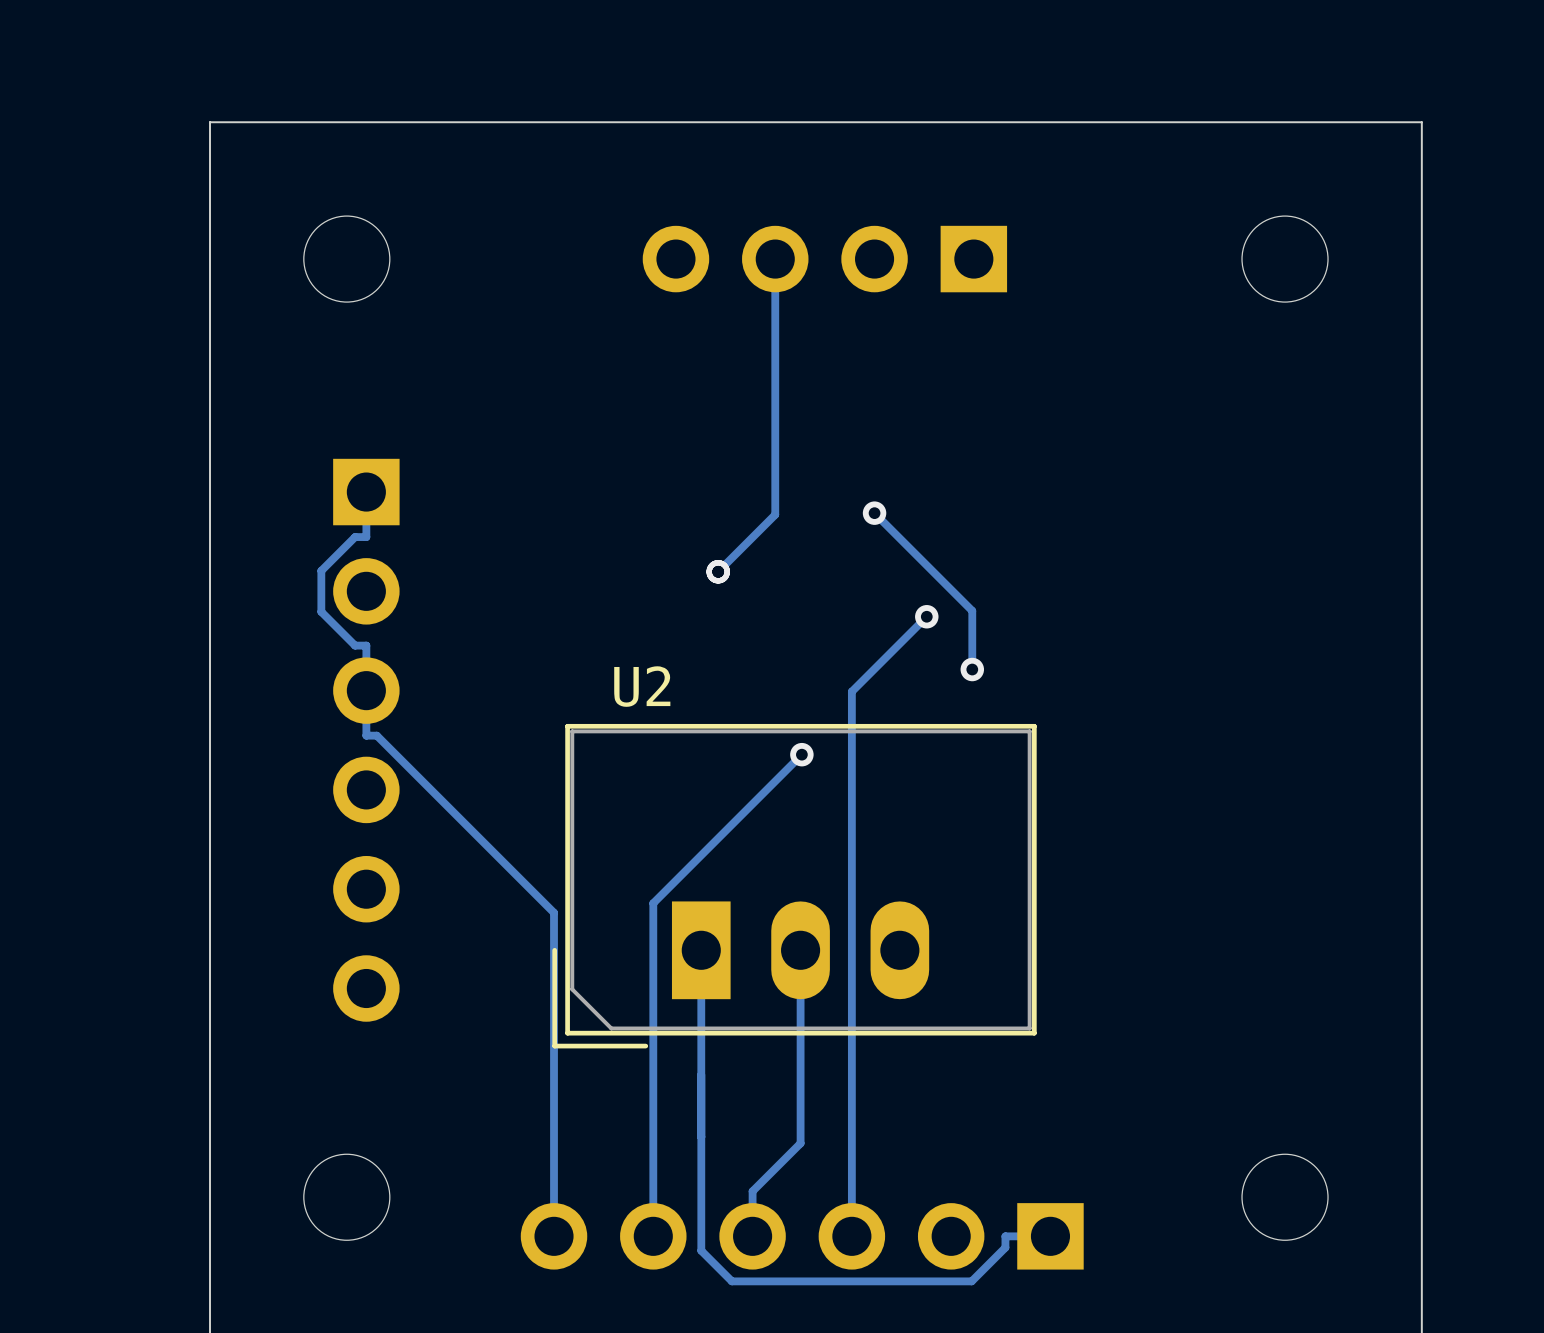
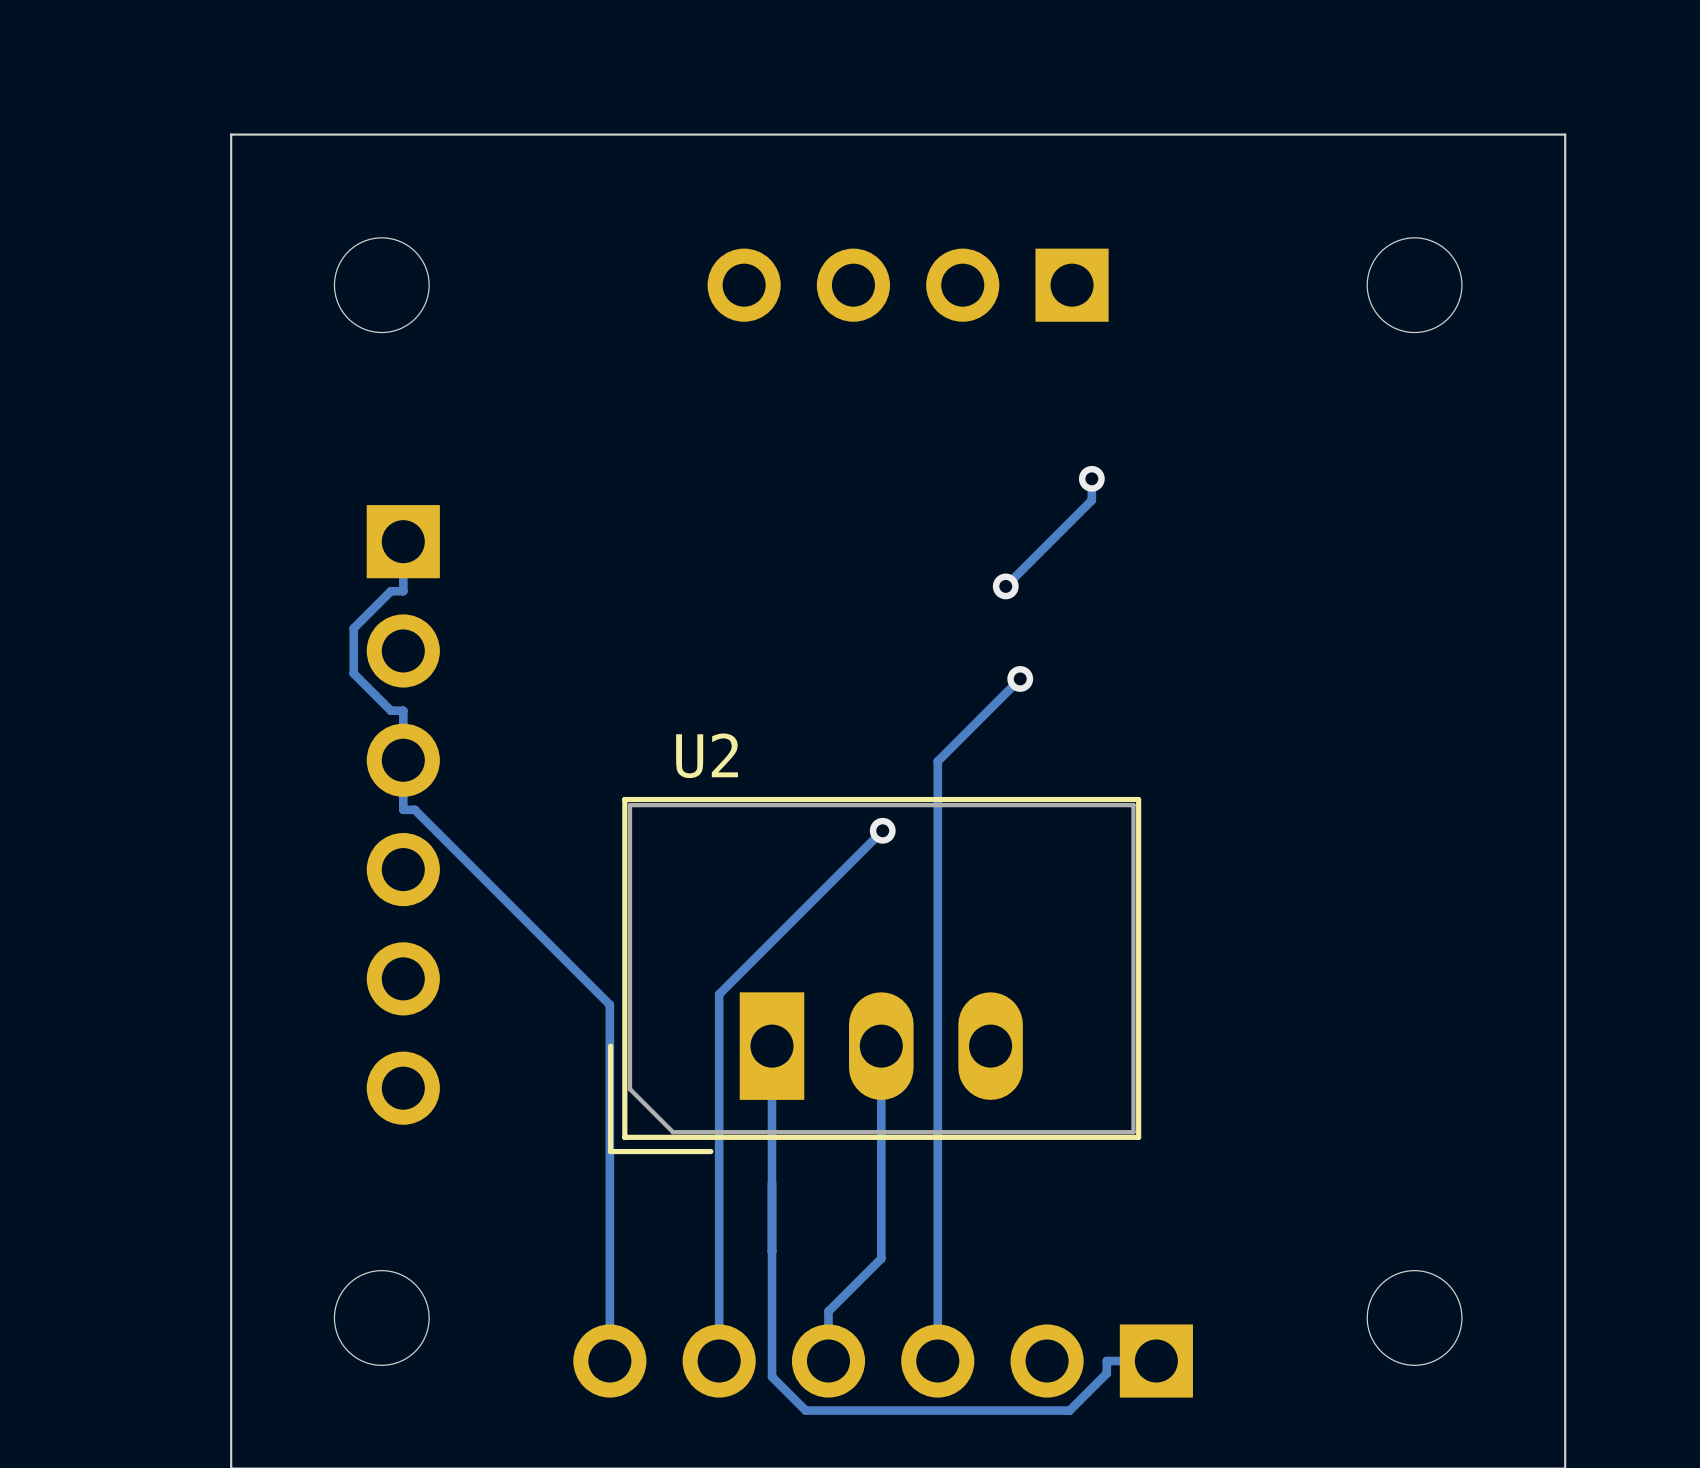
track: (775, 259) (775, 514) (718, 571) -> none
track: none -> (1091, 478) (1091, 500) (1005, 586)
via: none -> (1091, 478)
track: (874, 513) (972, 610) (972, 669) -> none
via position: (874, 513) -> (1005, 586)
via: (718, 571) -> none
via: (972, 669) -> none

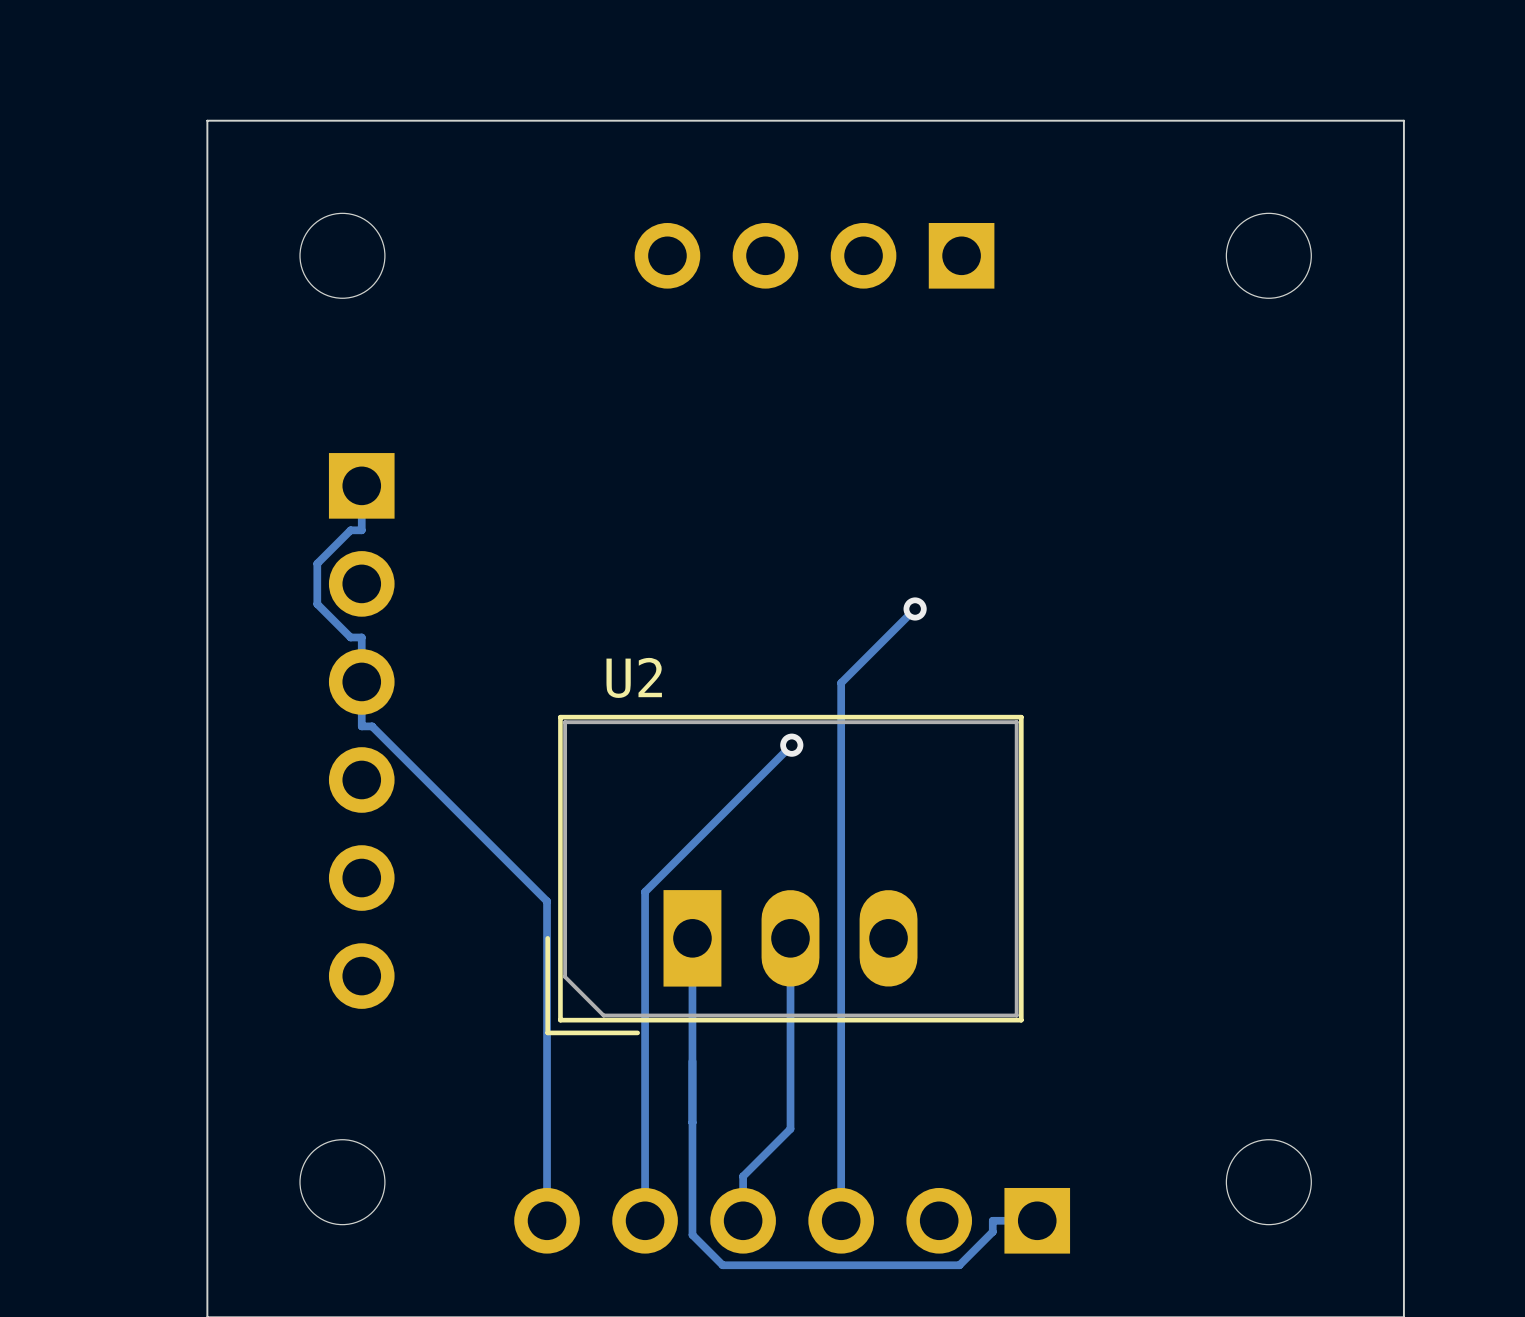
track: (1091, 478) (1091, 500) (1005, 586) -> none
via: (1091, 478) -> none
via: (1005, 586) -> none

